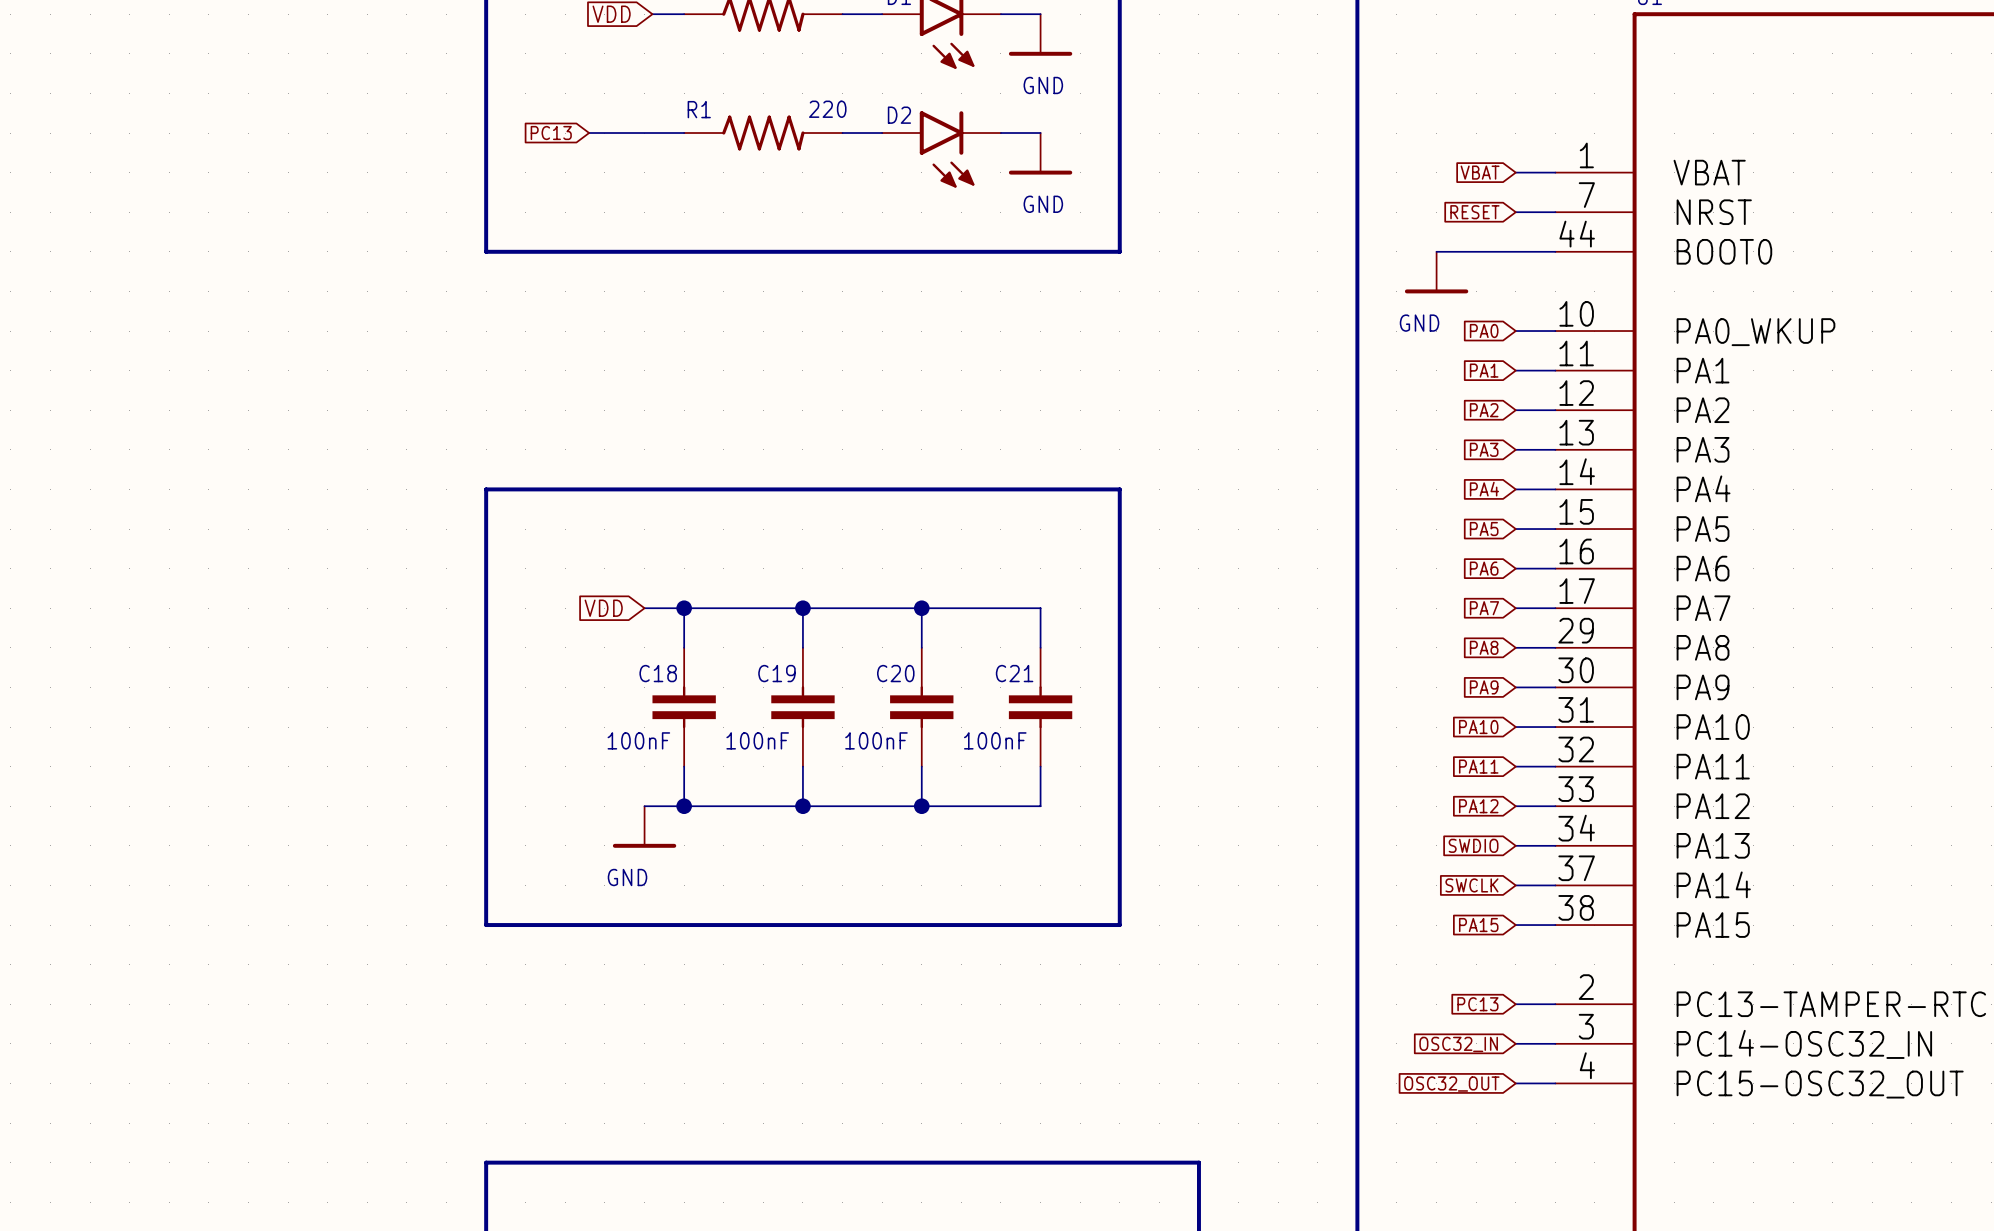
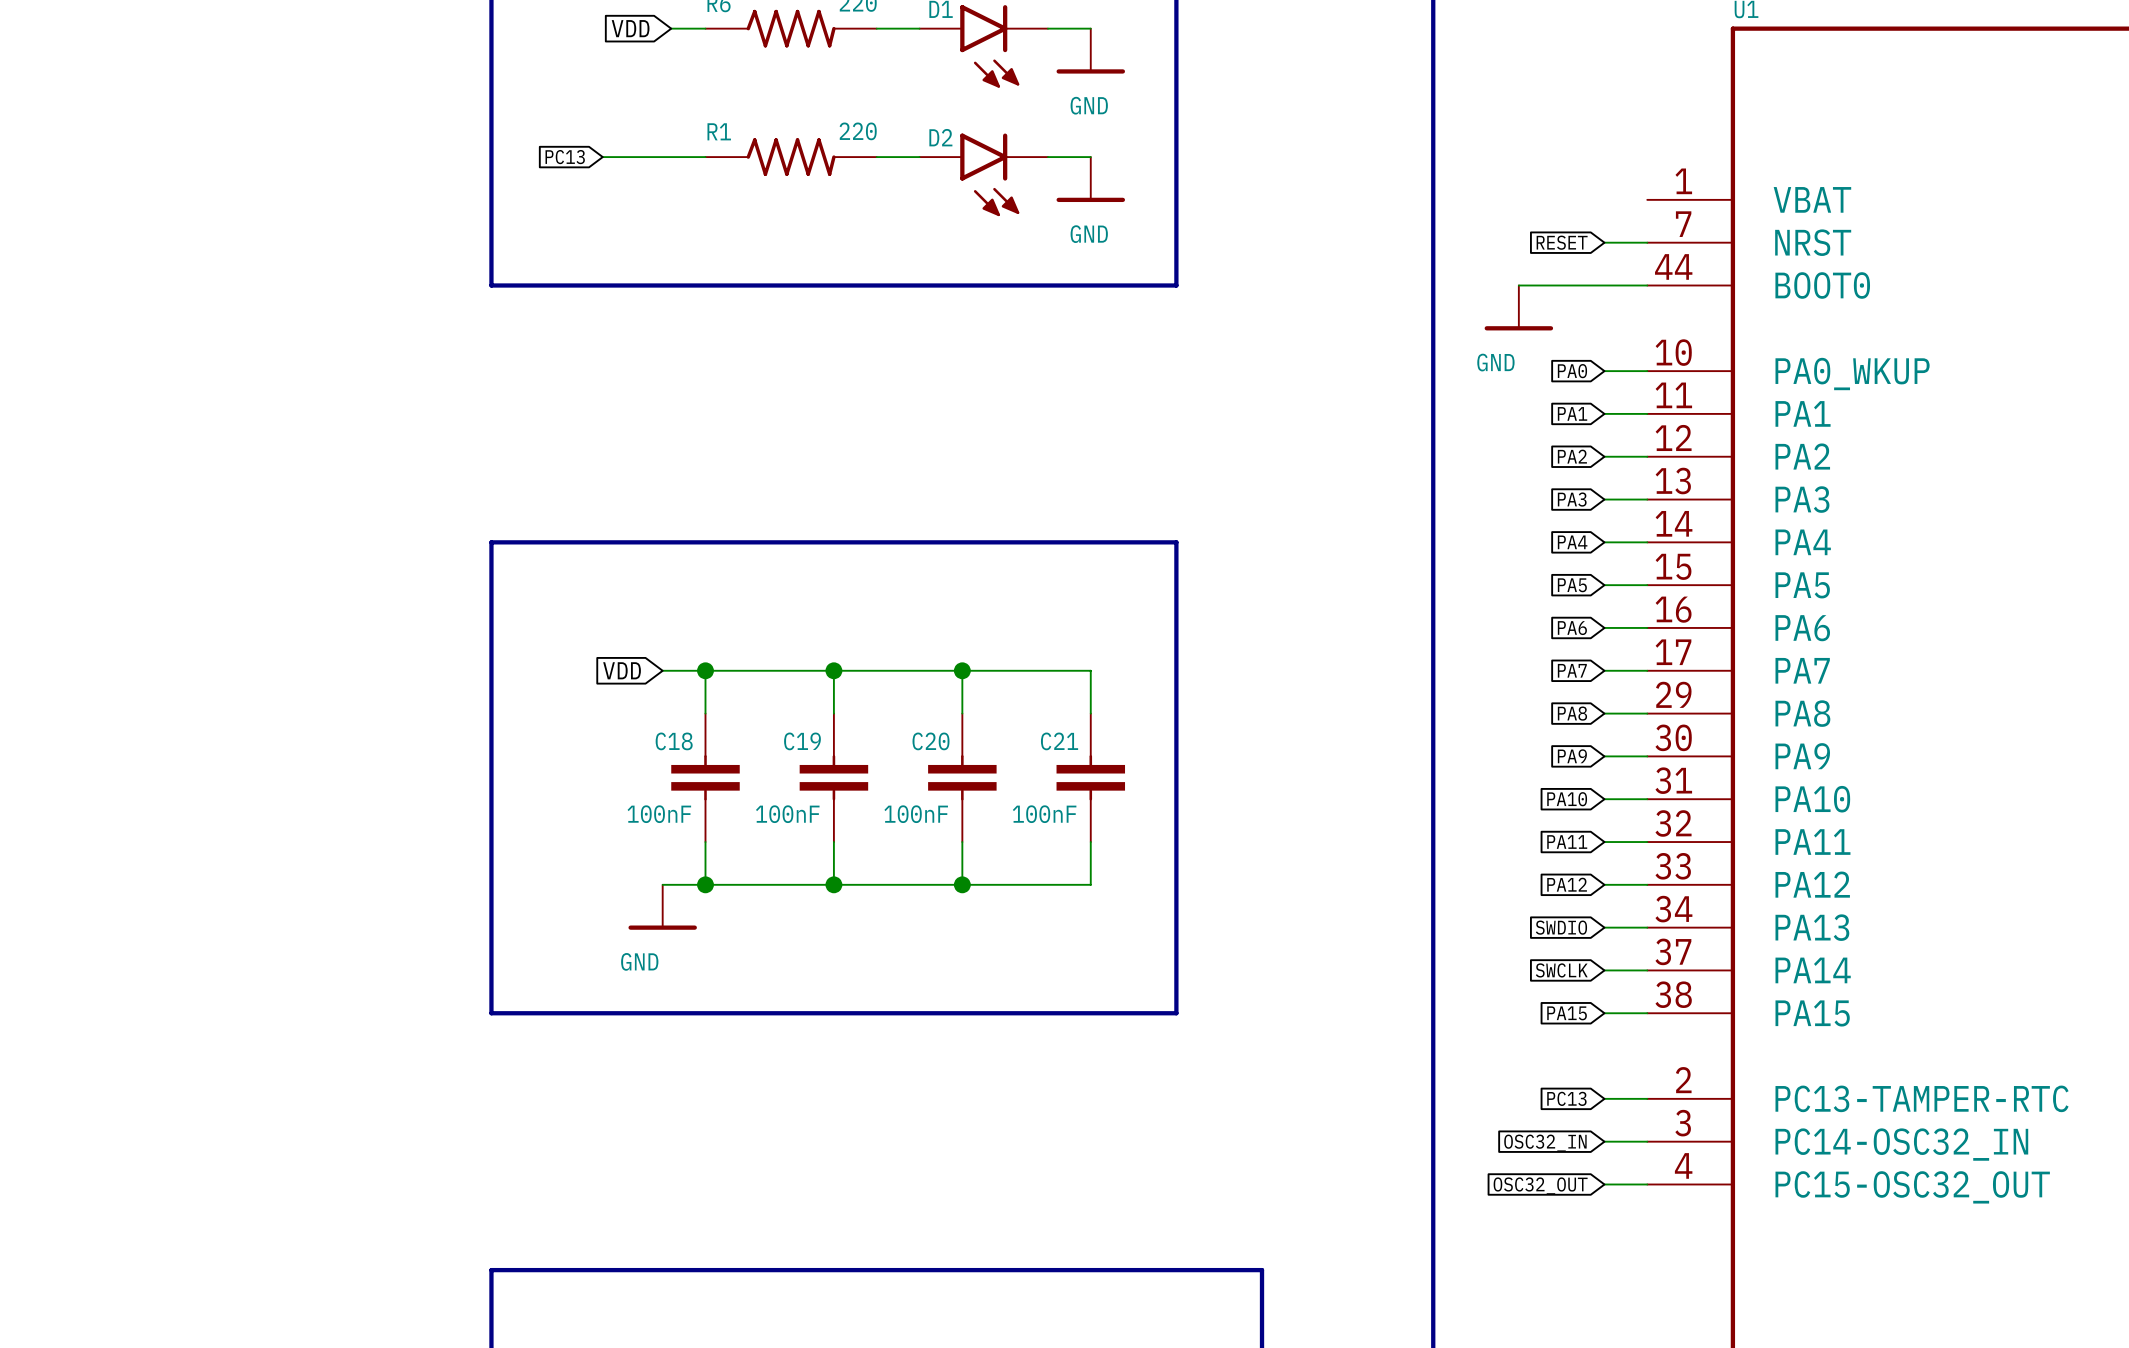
global label: VBAT (1480, 172) -> none
wire: (1515, 172) (1555, 172) -> none

